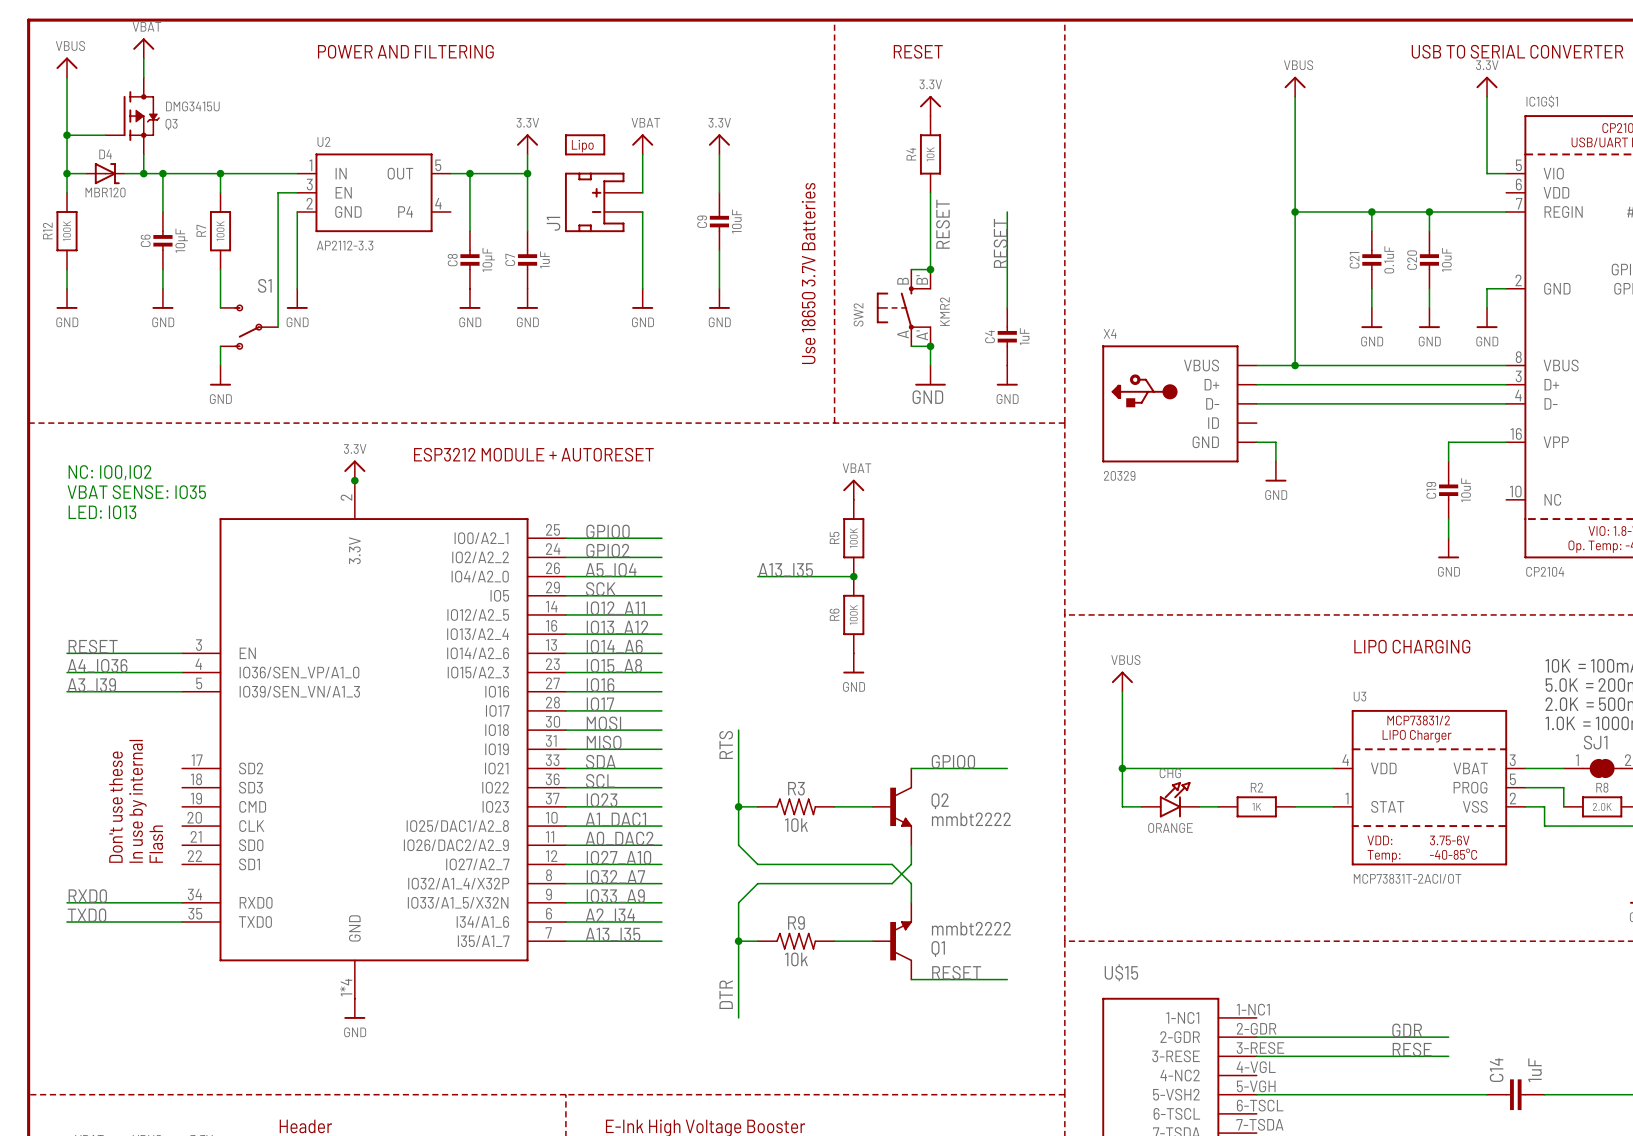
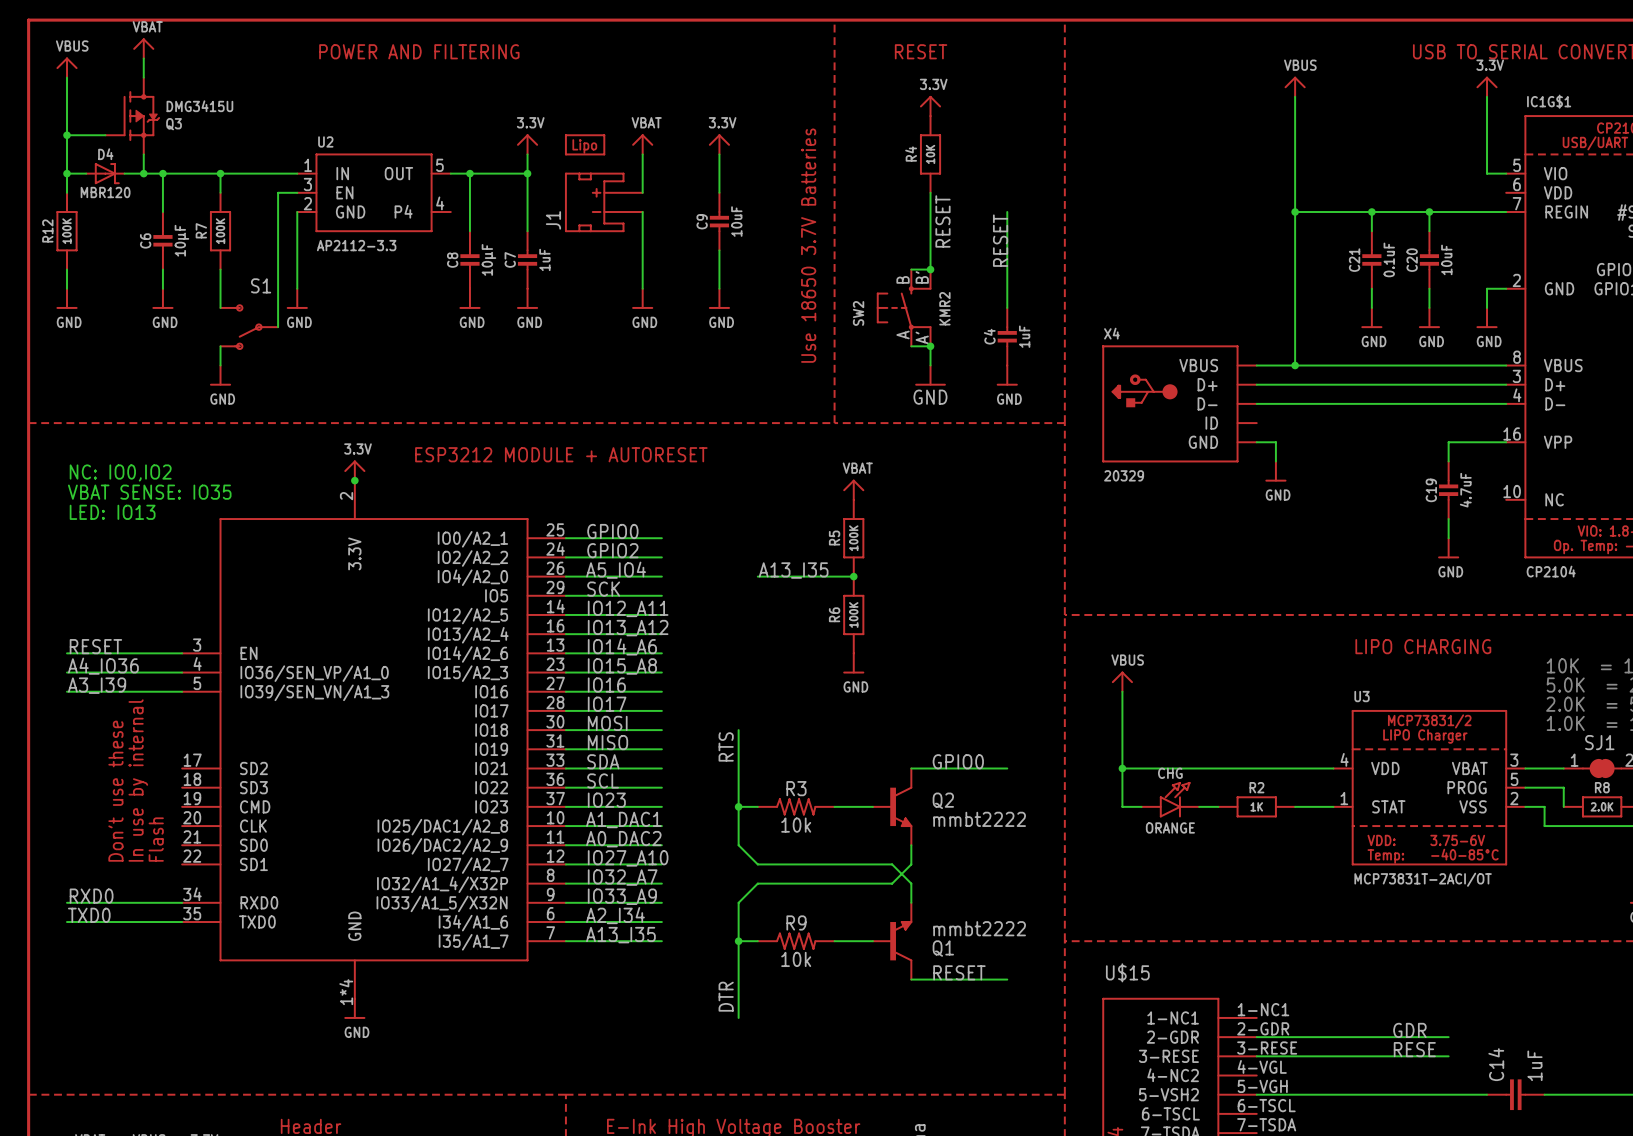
C19 value: 10uF (1466, 490) -> 4.7uF (1465, 490)

